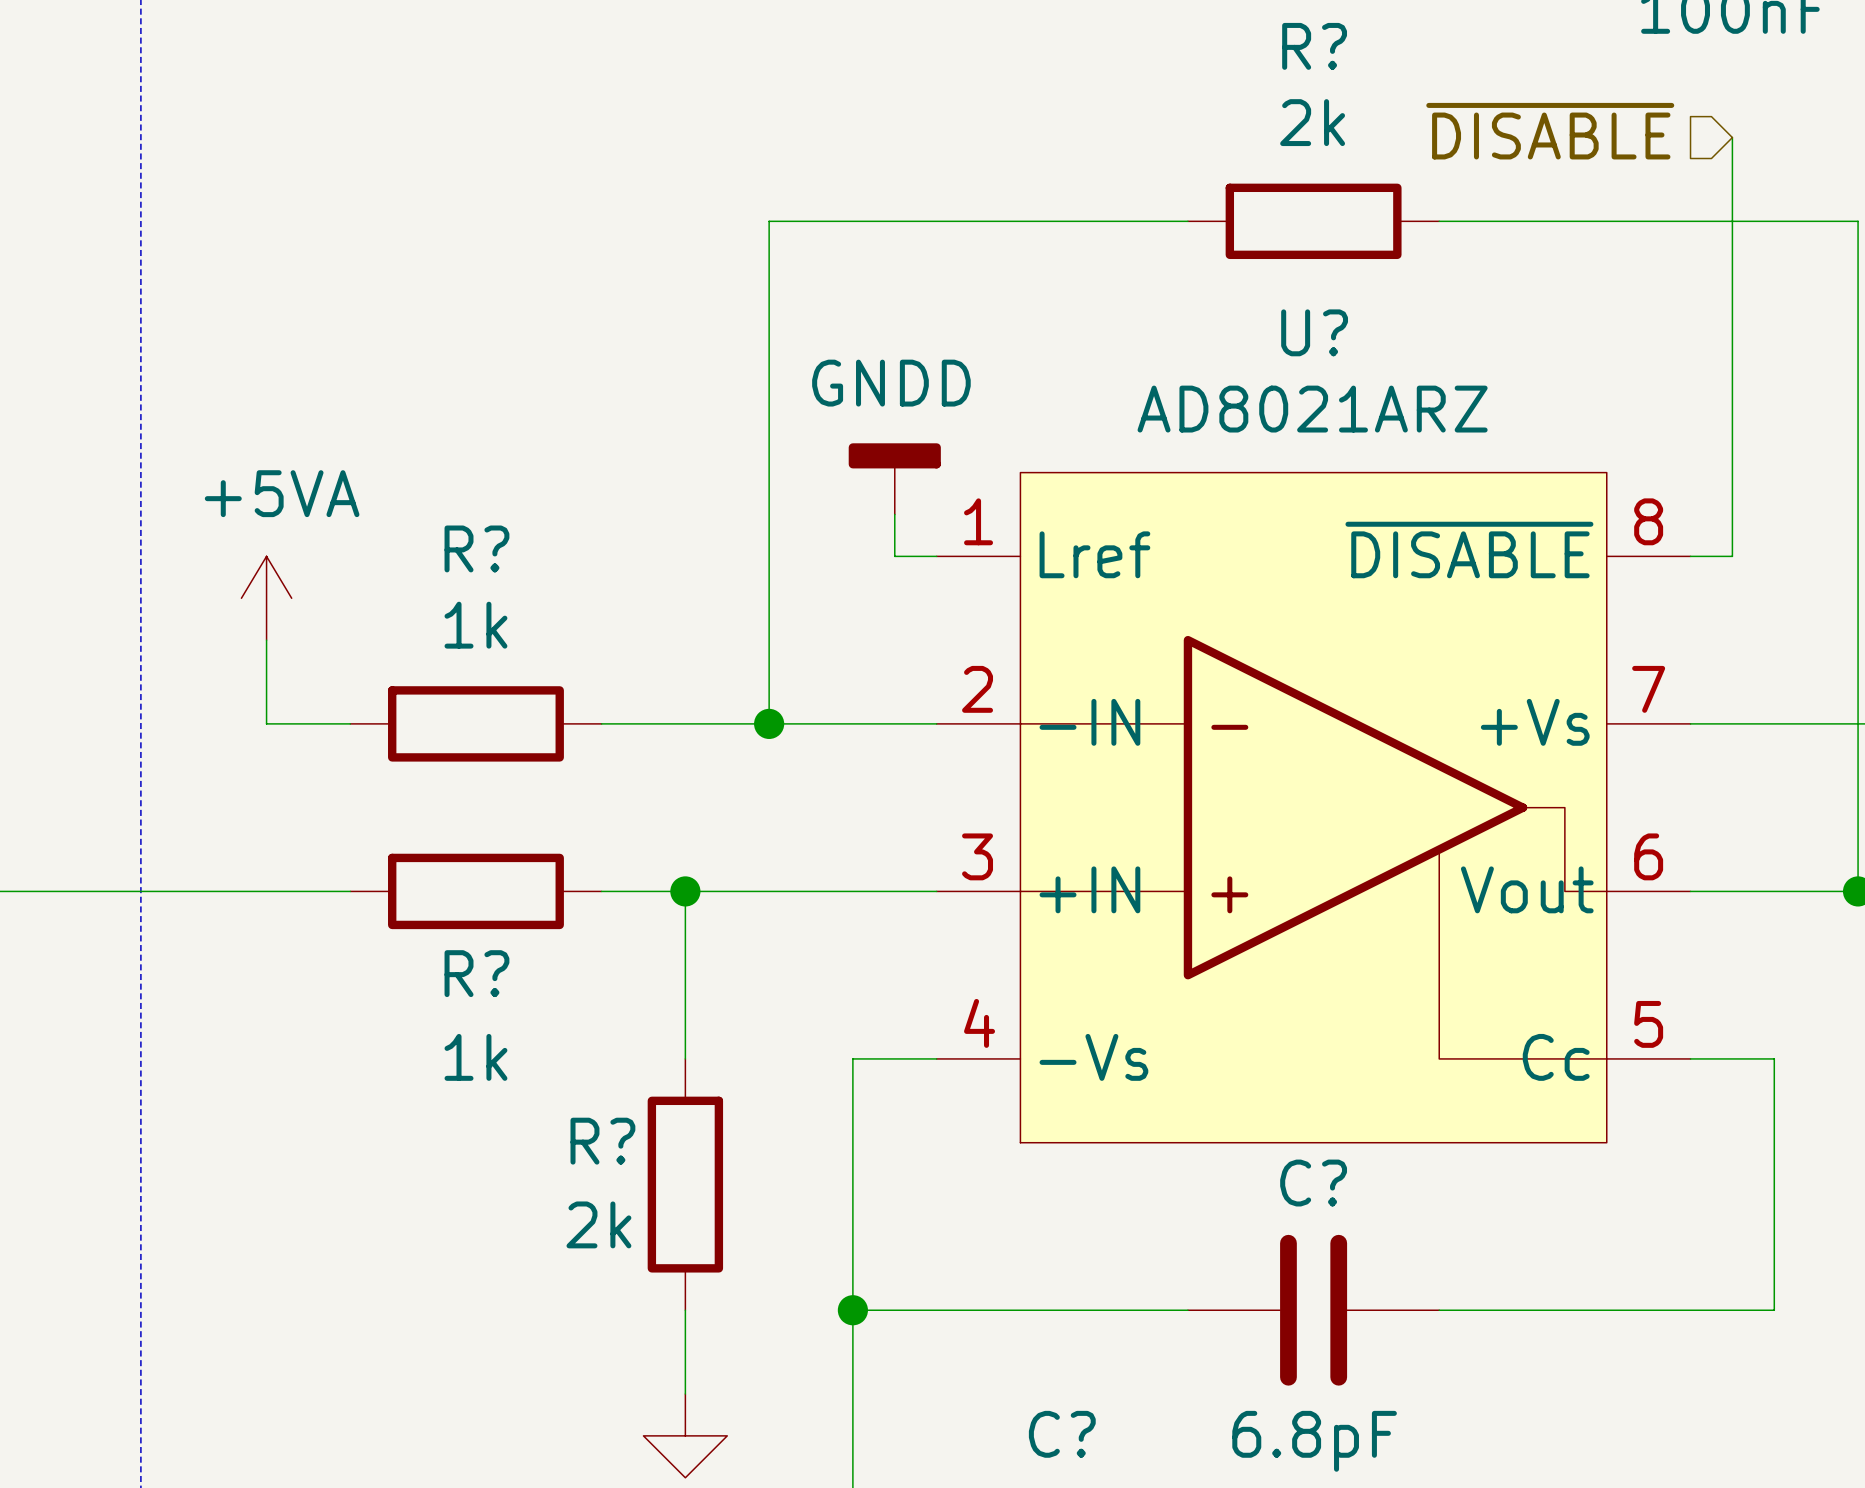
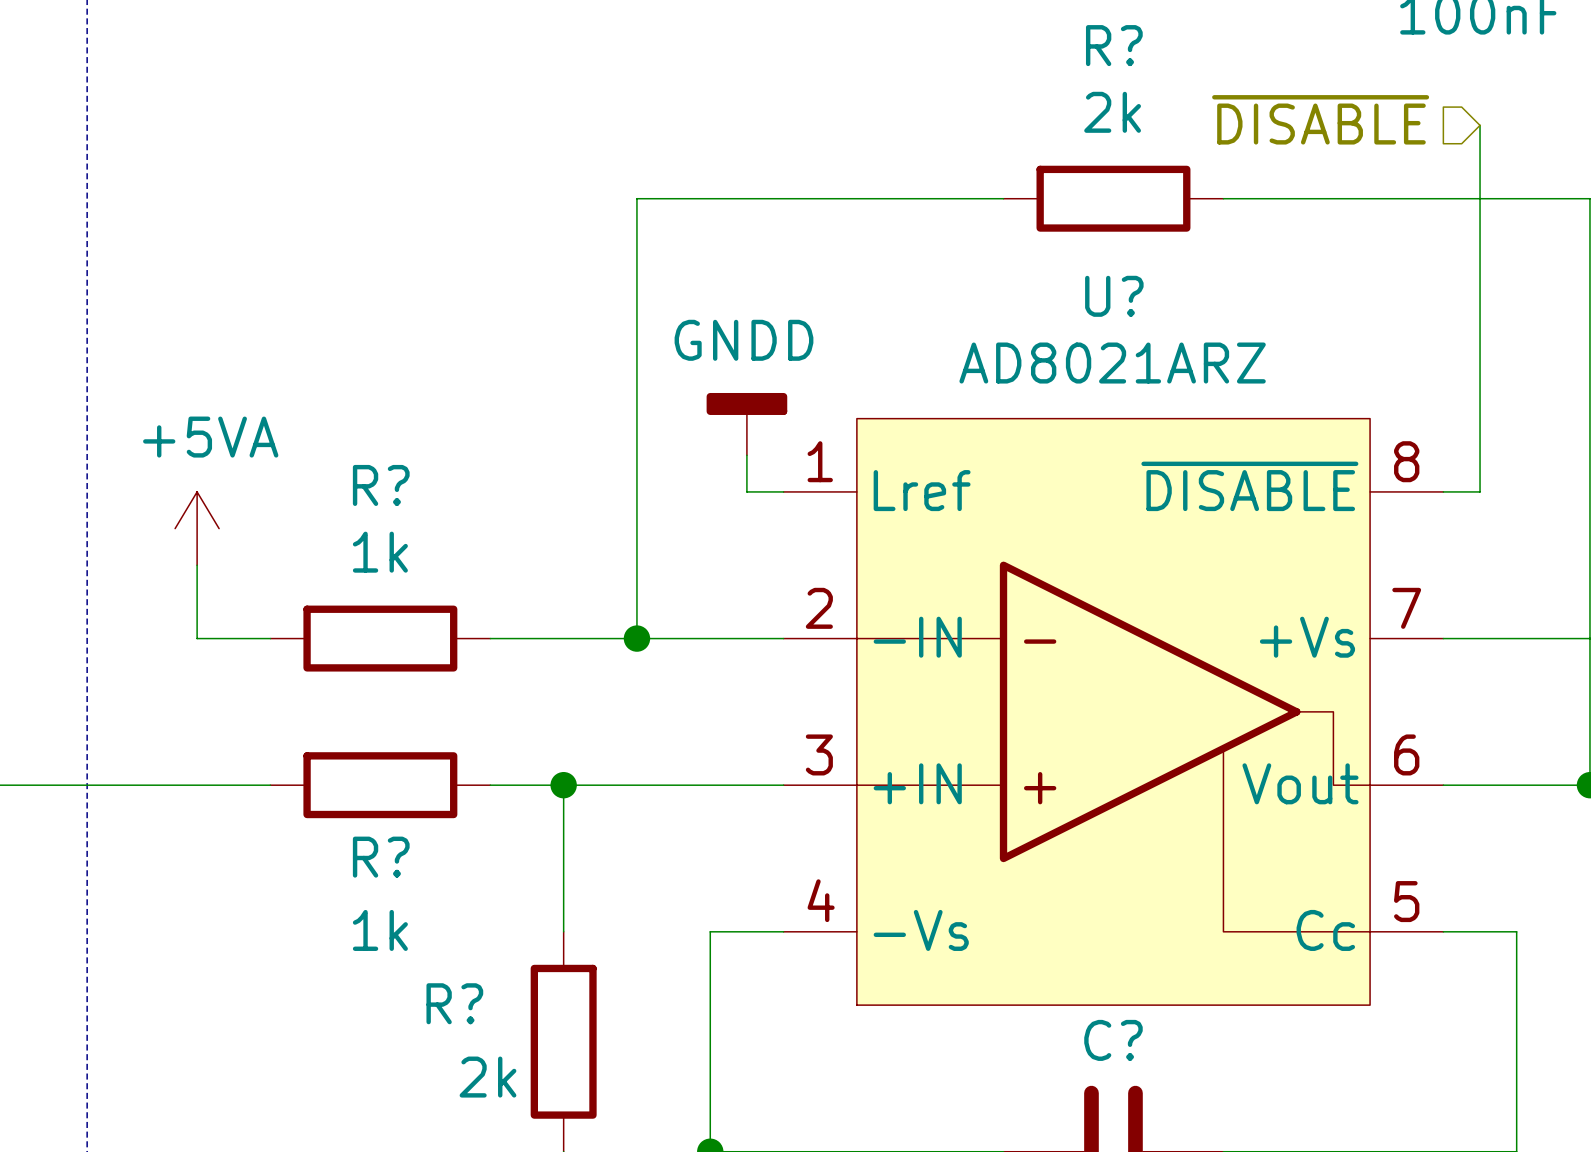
R? name position: R? (602, 1141) -> R? (454, 1003)

